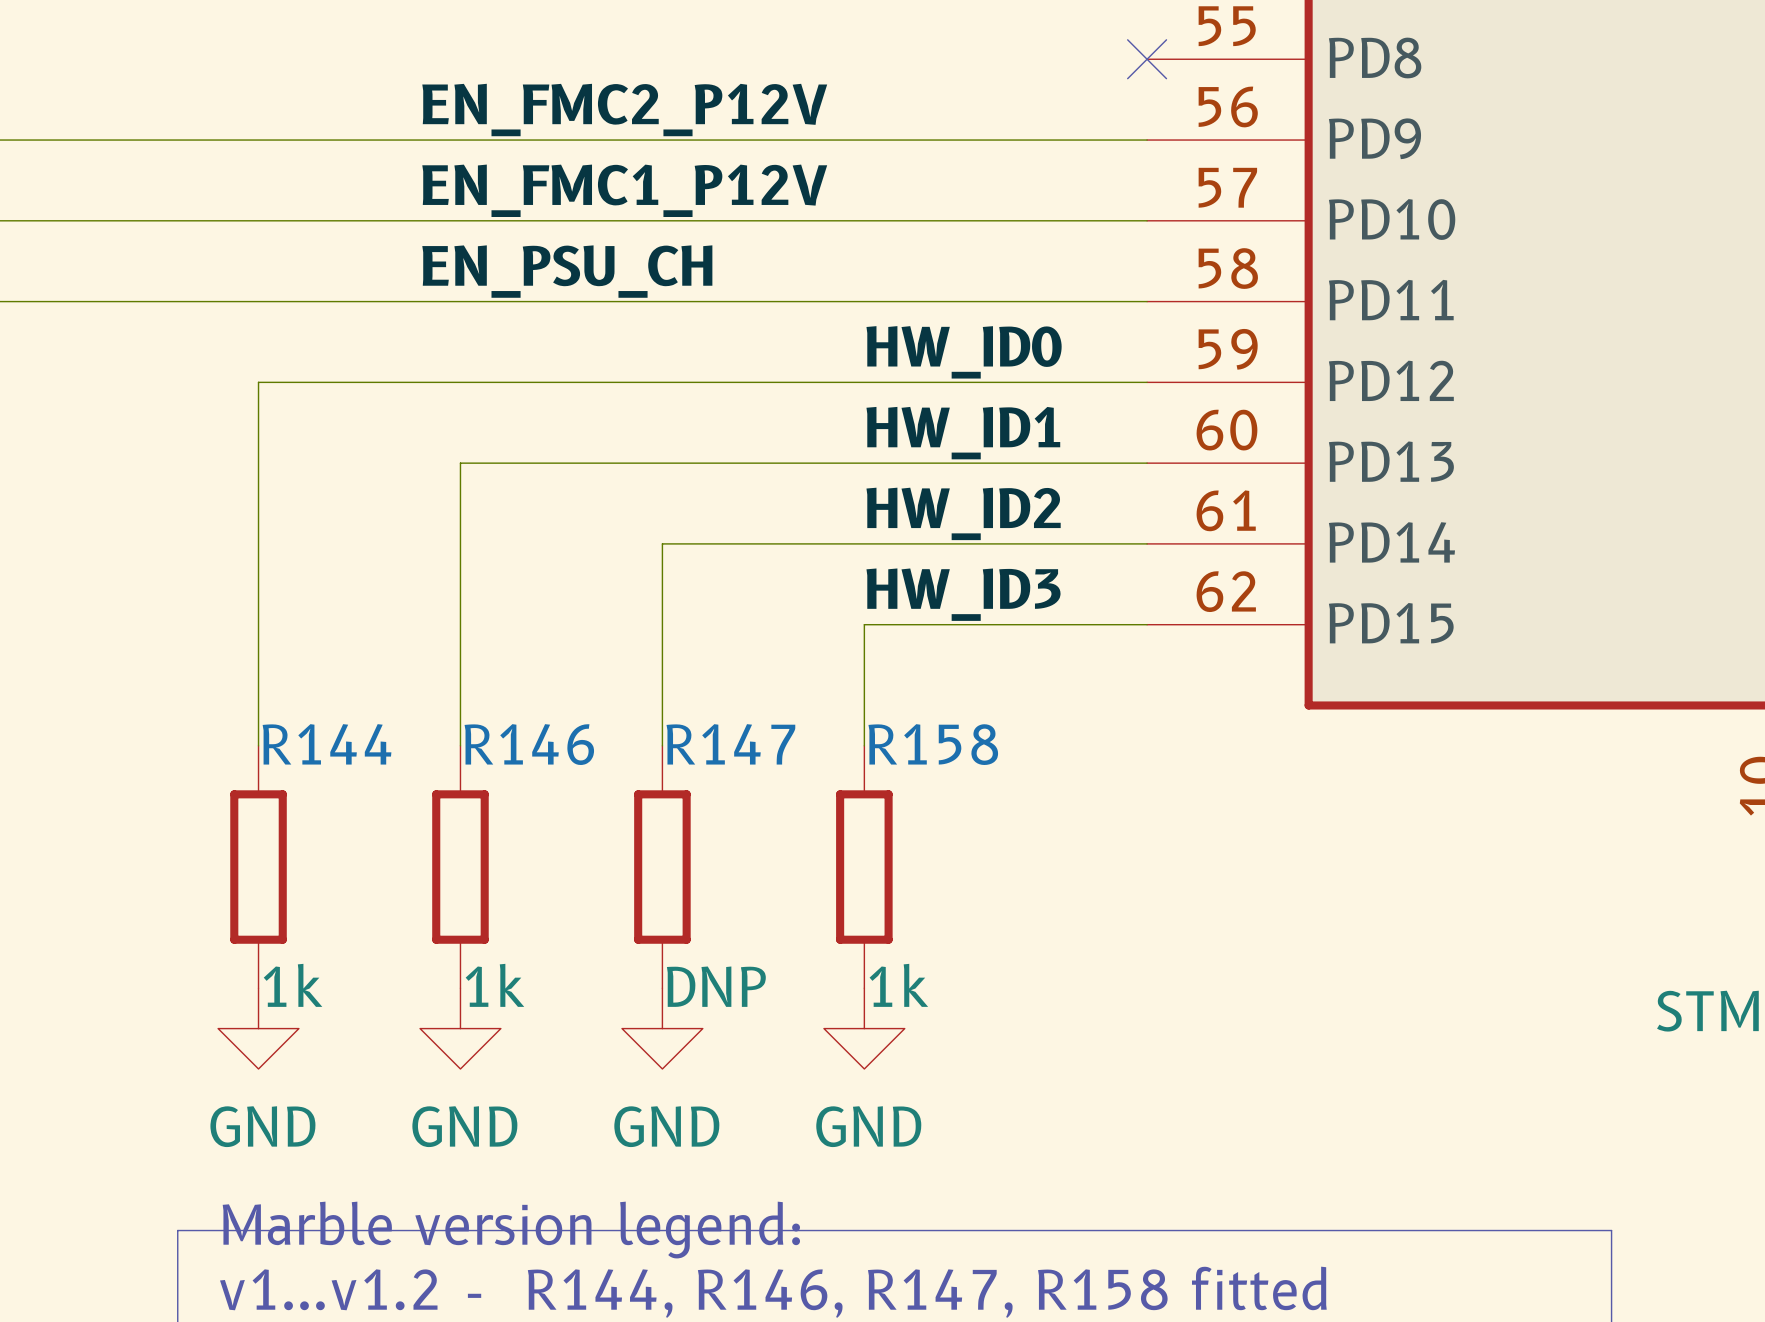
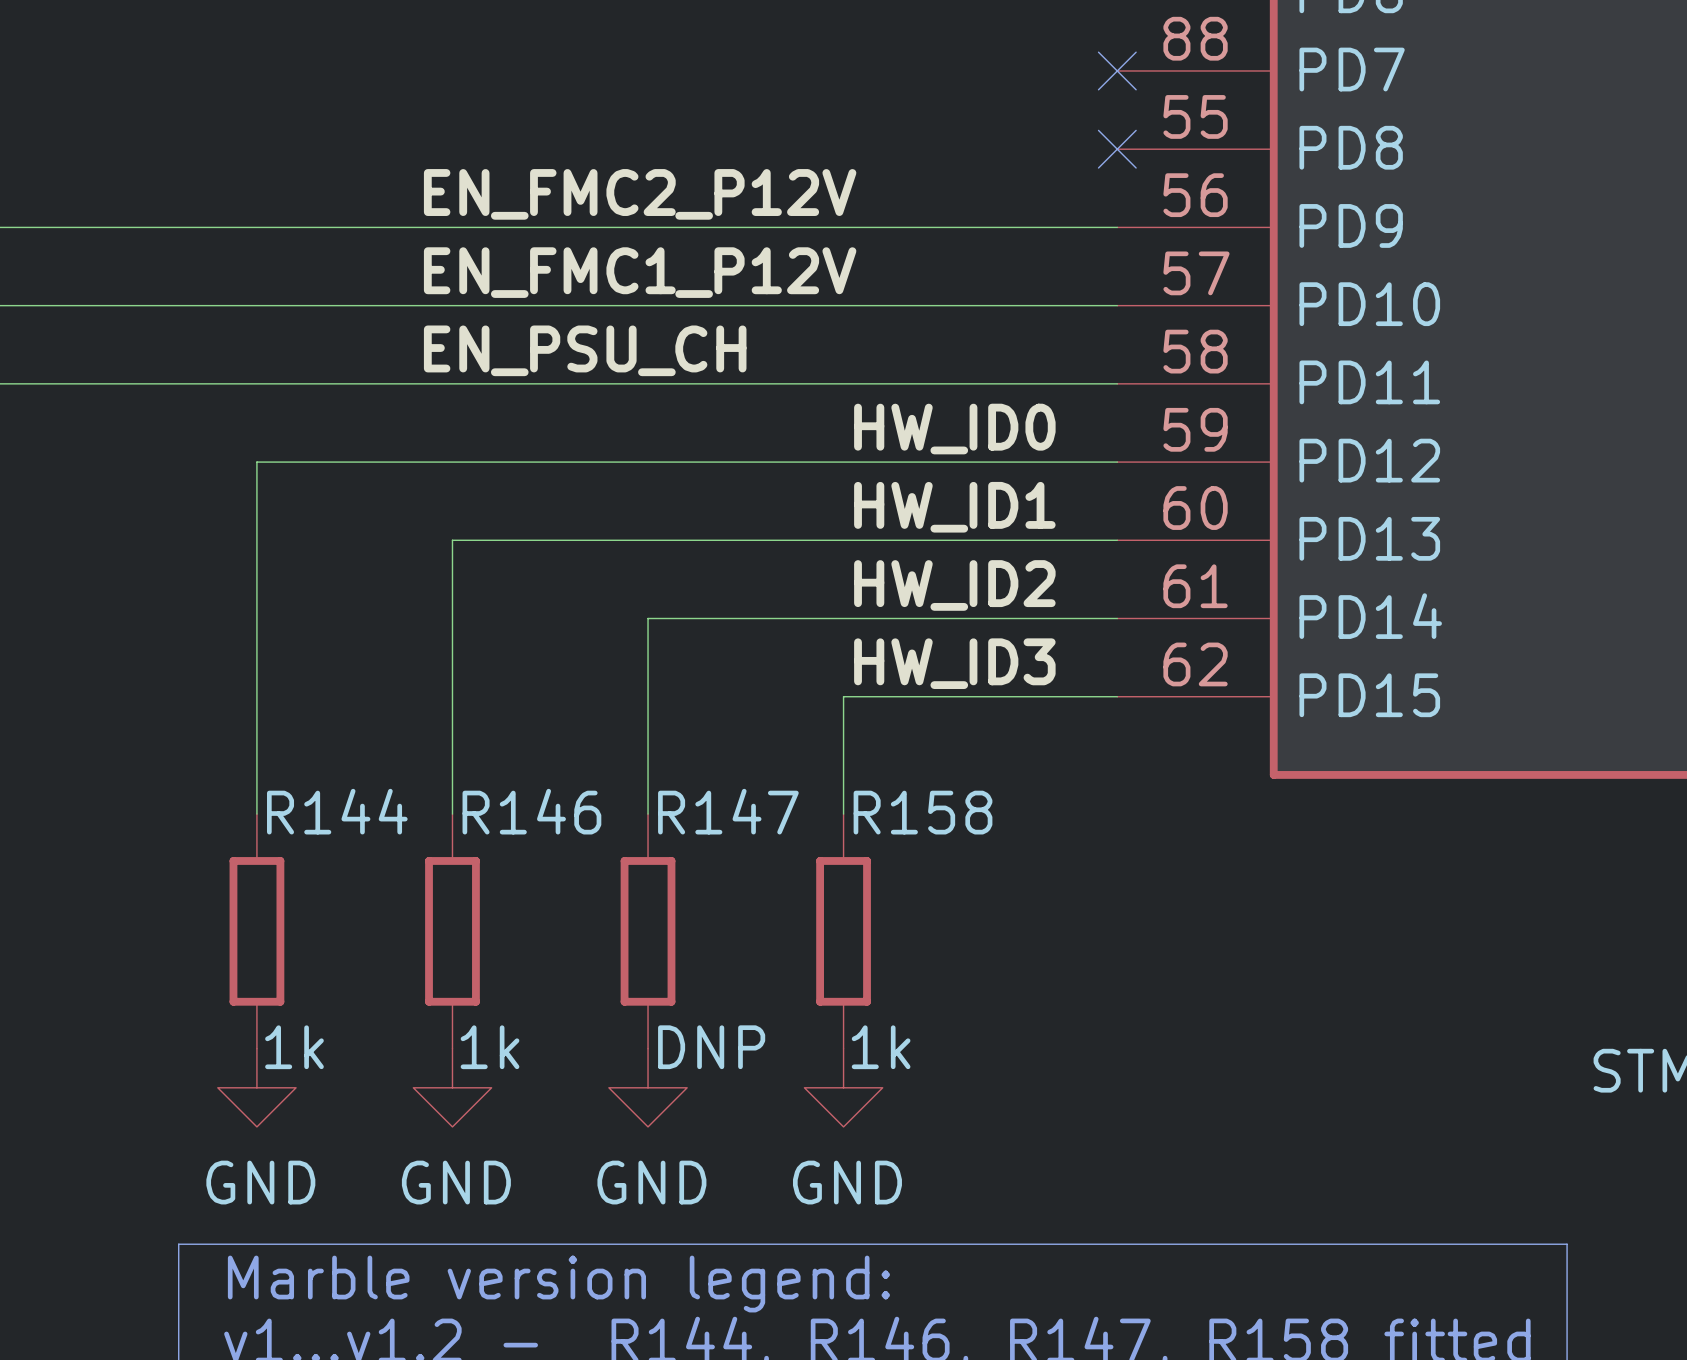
line: (177, 1230) (1611, 1230) -> (178, 1283) (178, 1244) (1567, 1244) (1567, 1283)

